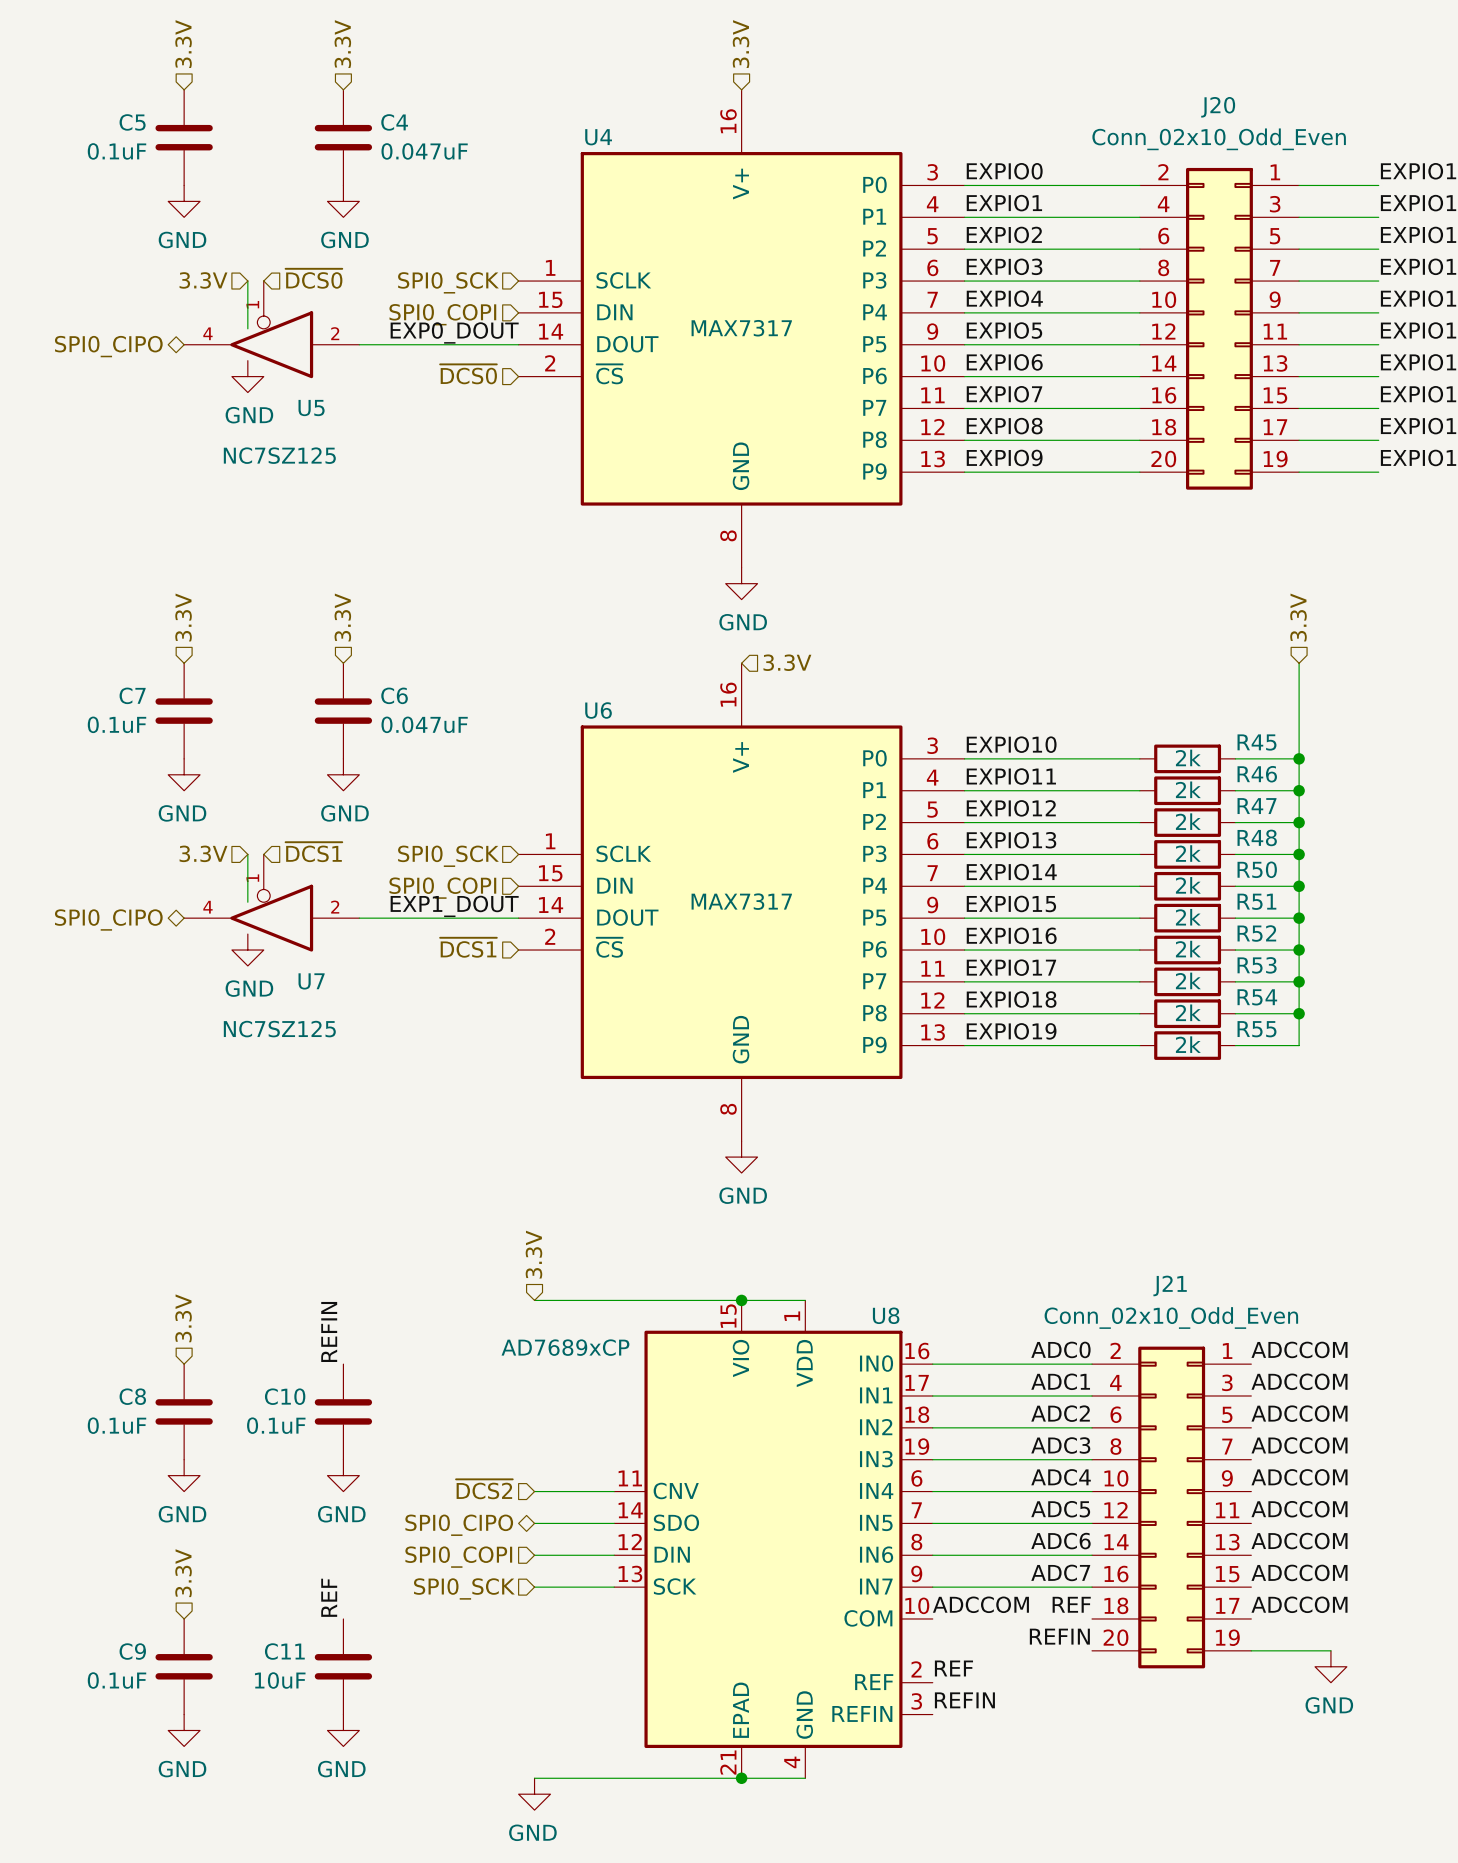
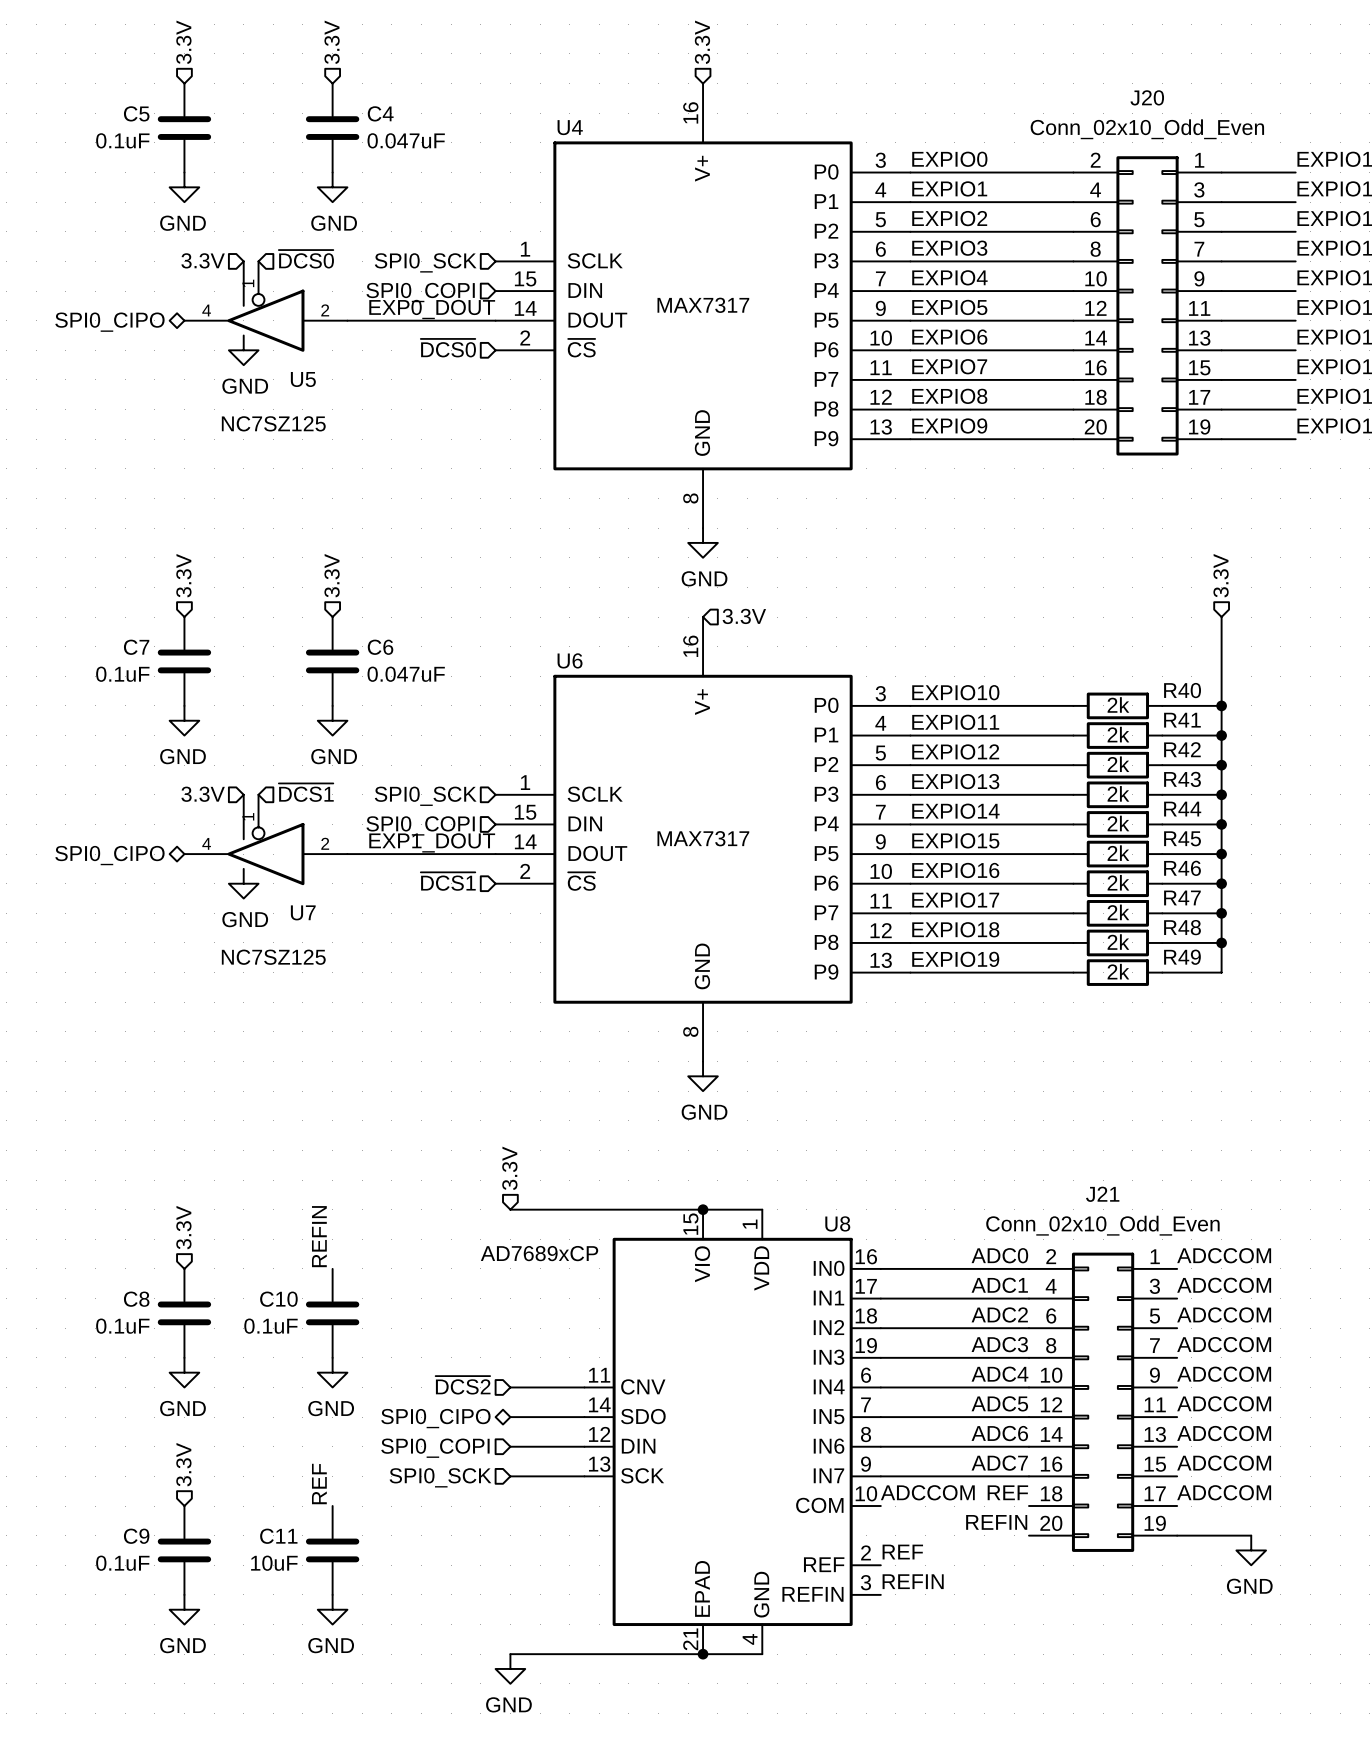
R45 name: R45 (1256, 742) -> R40 (1182, 690)
R46 name: R46 (1257, 774) -> R41 (1182, 720)
R47 name: R47 (1257, 806) -> R42 (1182, 749)
R48 name: R48 (1257, 837) -> R43 (1182, 779)
R50 name: R50 (1257, 869) -> R44 (1182, 809)
R51 name: R51 (1256, 901) -> R45 (1182, 838)
R52 name: R52 (1256, 933) -> R46 (1182, 868)
R53 name: R53 (1257, 965) -> R47 (1182, 897)
R54 name: R54 (1257, 997) -> R48 (1182, 927)
R55 name: R55 (1256, 1029) -> R49 (1182, 957)

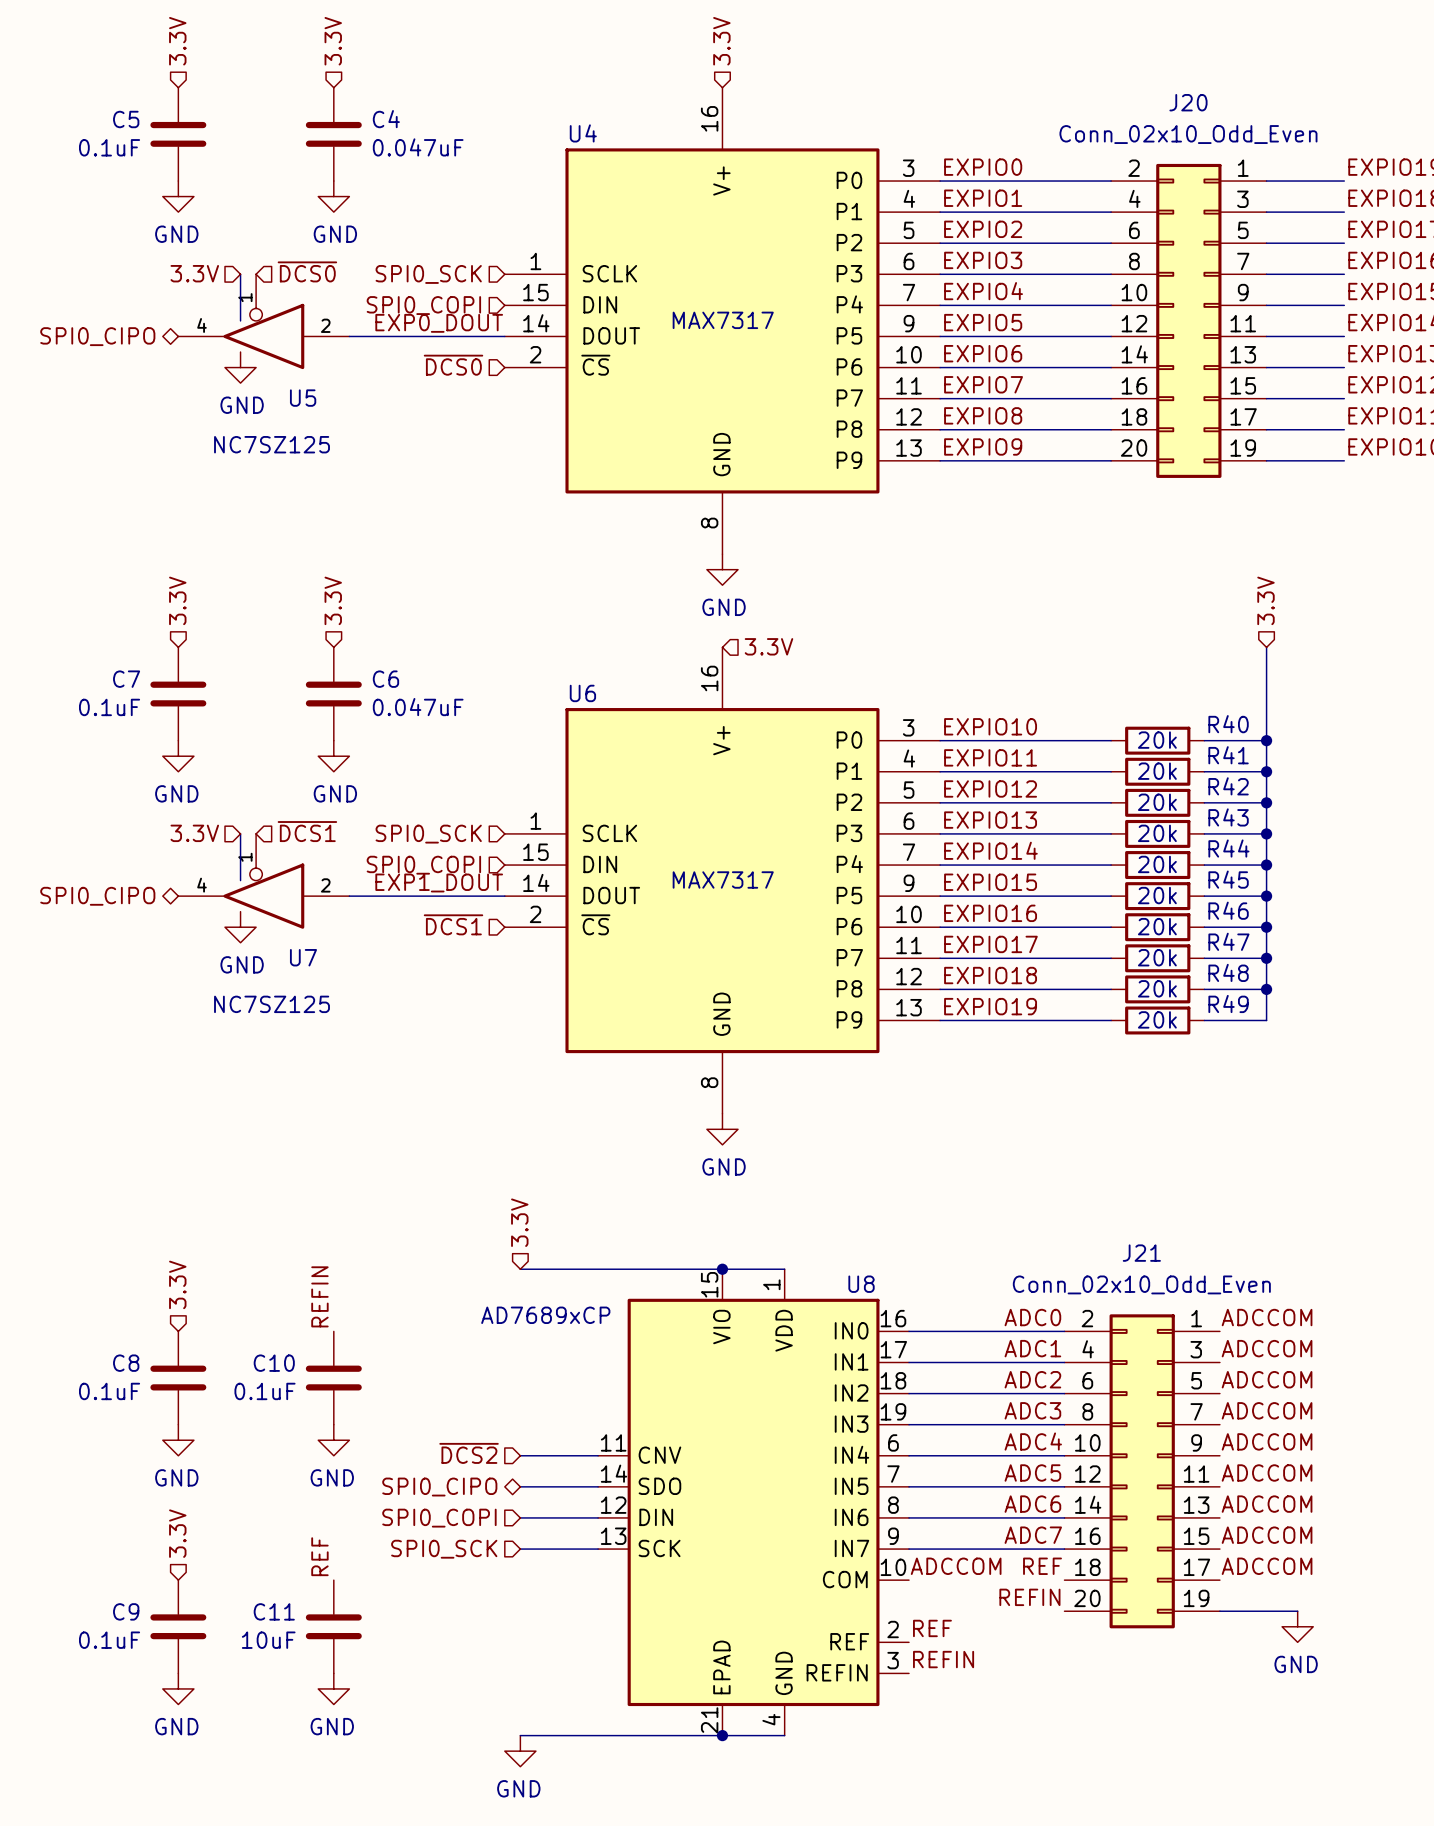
R40 value: 2k (1118, 704) -> 20k (1157, 740)
R41 value: 2k (1118, 734) -> 20k (1157, 771)
R42 value: 2k (1118, 764) -> 20k (1157, 802)
R43 value: 2k (1118, 793) -> 20k (1157, 833)
R44 value: 2k (1118, 823) -> 20k (1157, 864)
R45 value: 2k (1118, 853) -> 20k (1157, 895)
R46 value: 2k (1118, 882) -> 20k (1157, 926)
R47 value: 2k (1118, 912) -> 20k (1157, 957)
R48 value: 2k (1118, 942) -> 20k (1157, 988)
R49 value: 2k (1118, 971) -> 20k (1157, 1019)

